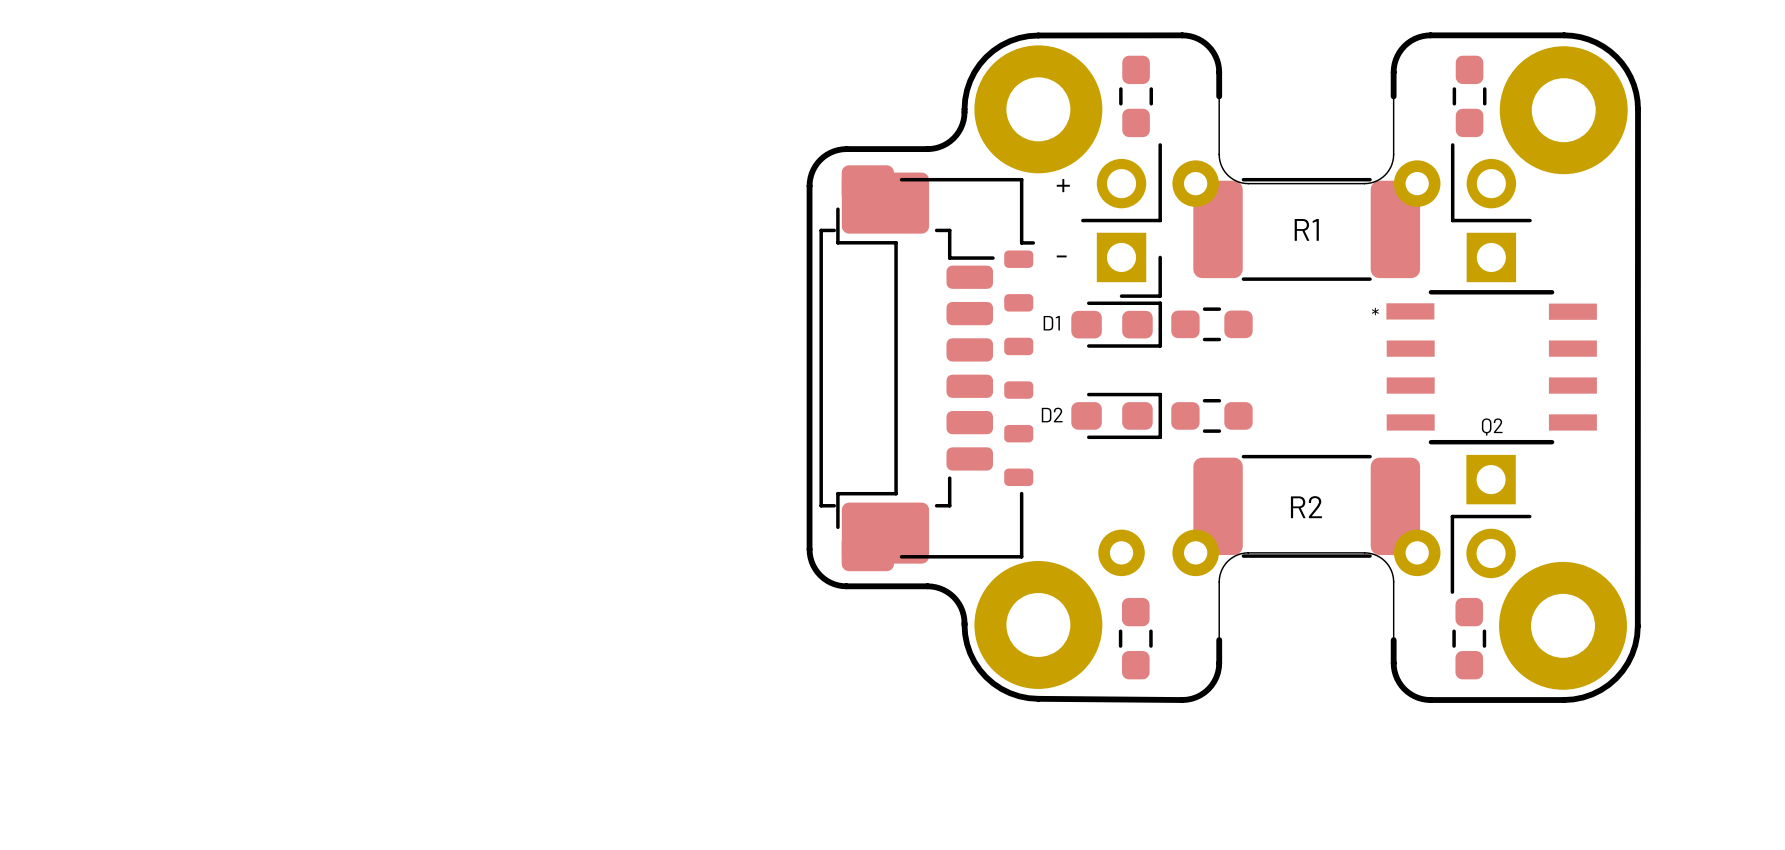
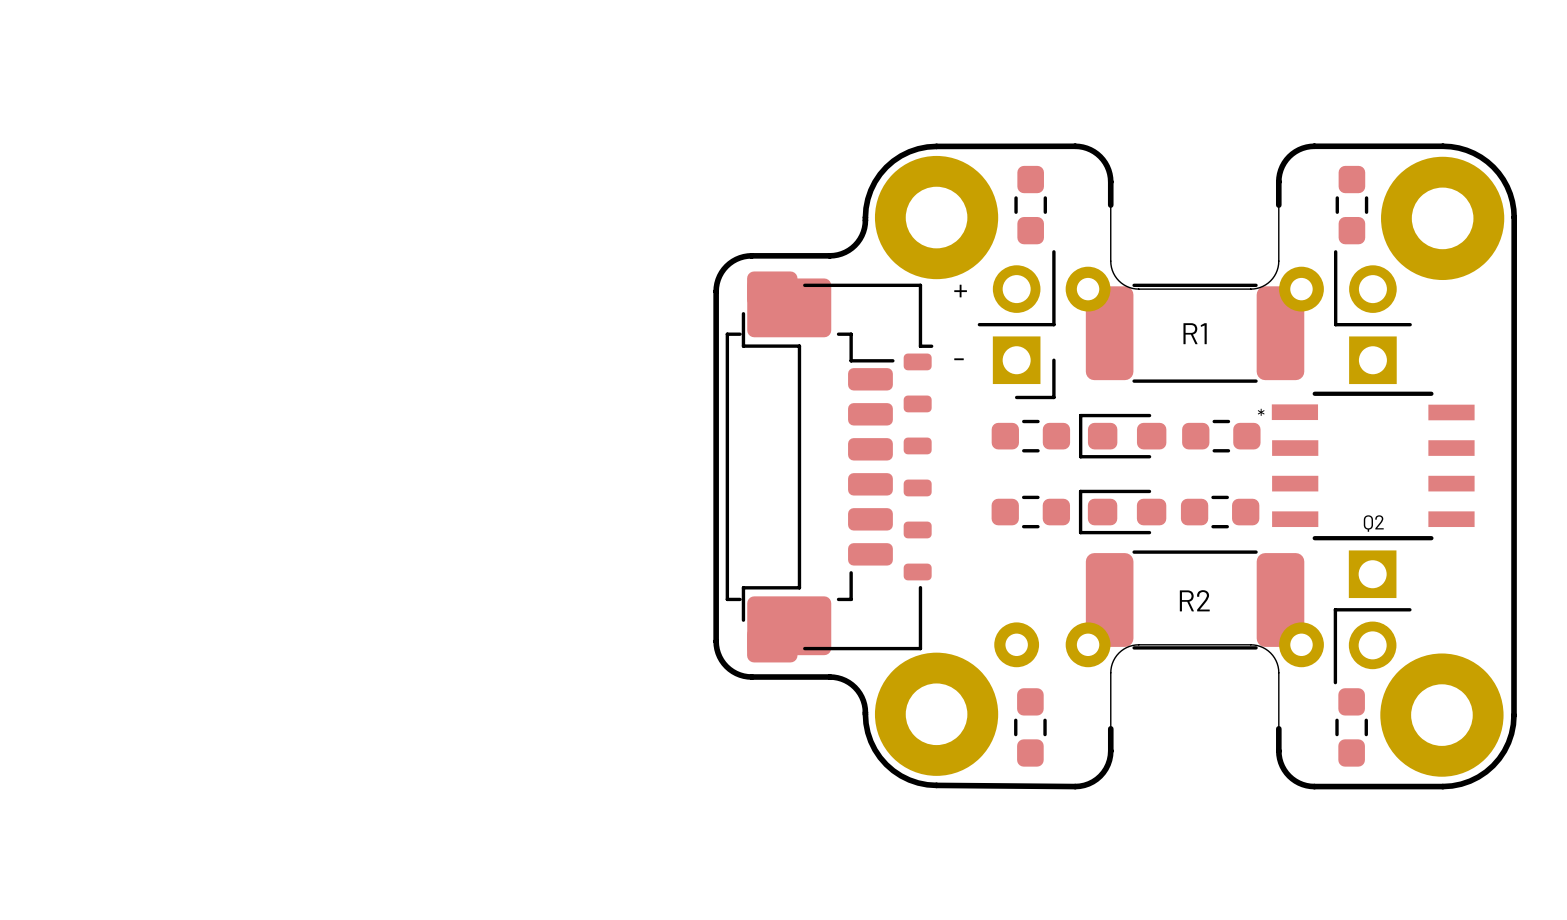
part footprint: [1171, 307, 1253, 342] -> [1078, 413, 1167, 459]
D1: (1116, 324) -> none
part: none -> (1030, 436)
part: none -> (1221, 436)
part footprint: [1171, 398, 1253, 433] -> [1078, 489, 1167, 535]
D2: (1116, 415) -> none
part: none -> (1030, 512)
part: none -> (1220, 512)

